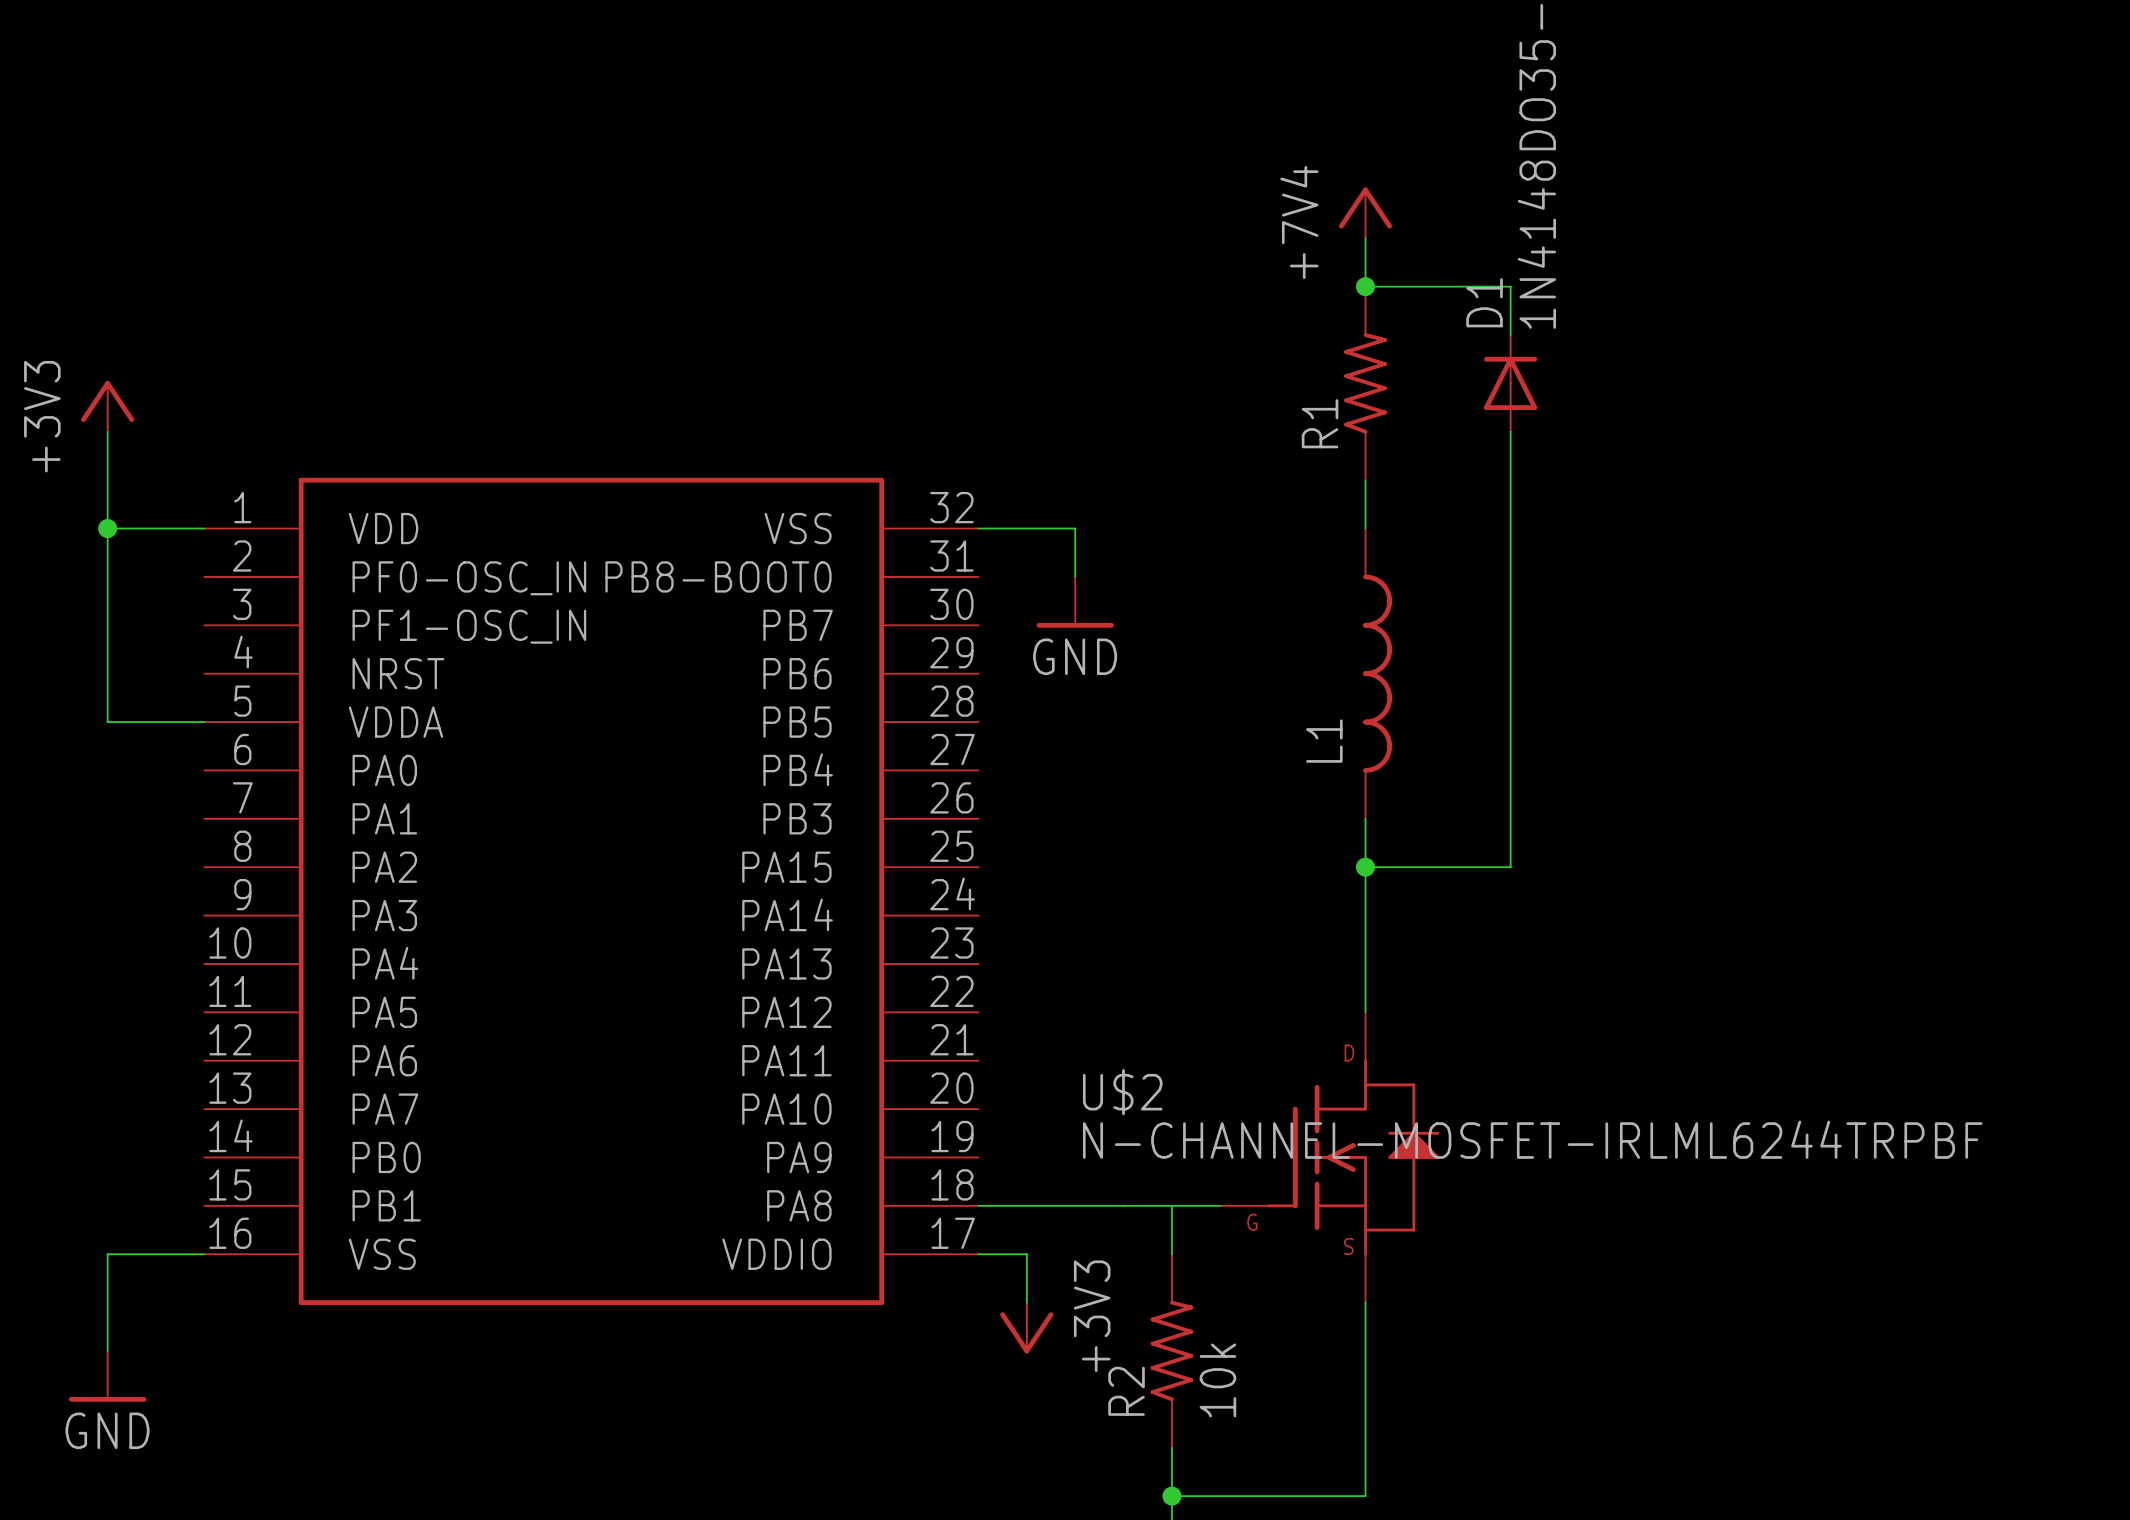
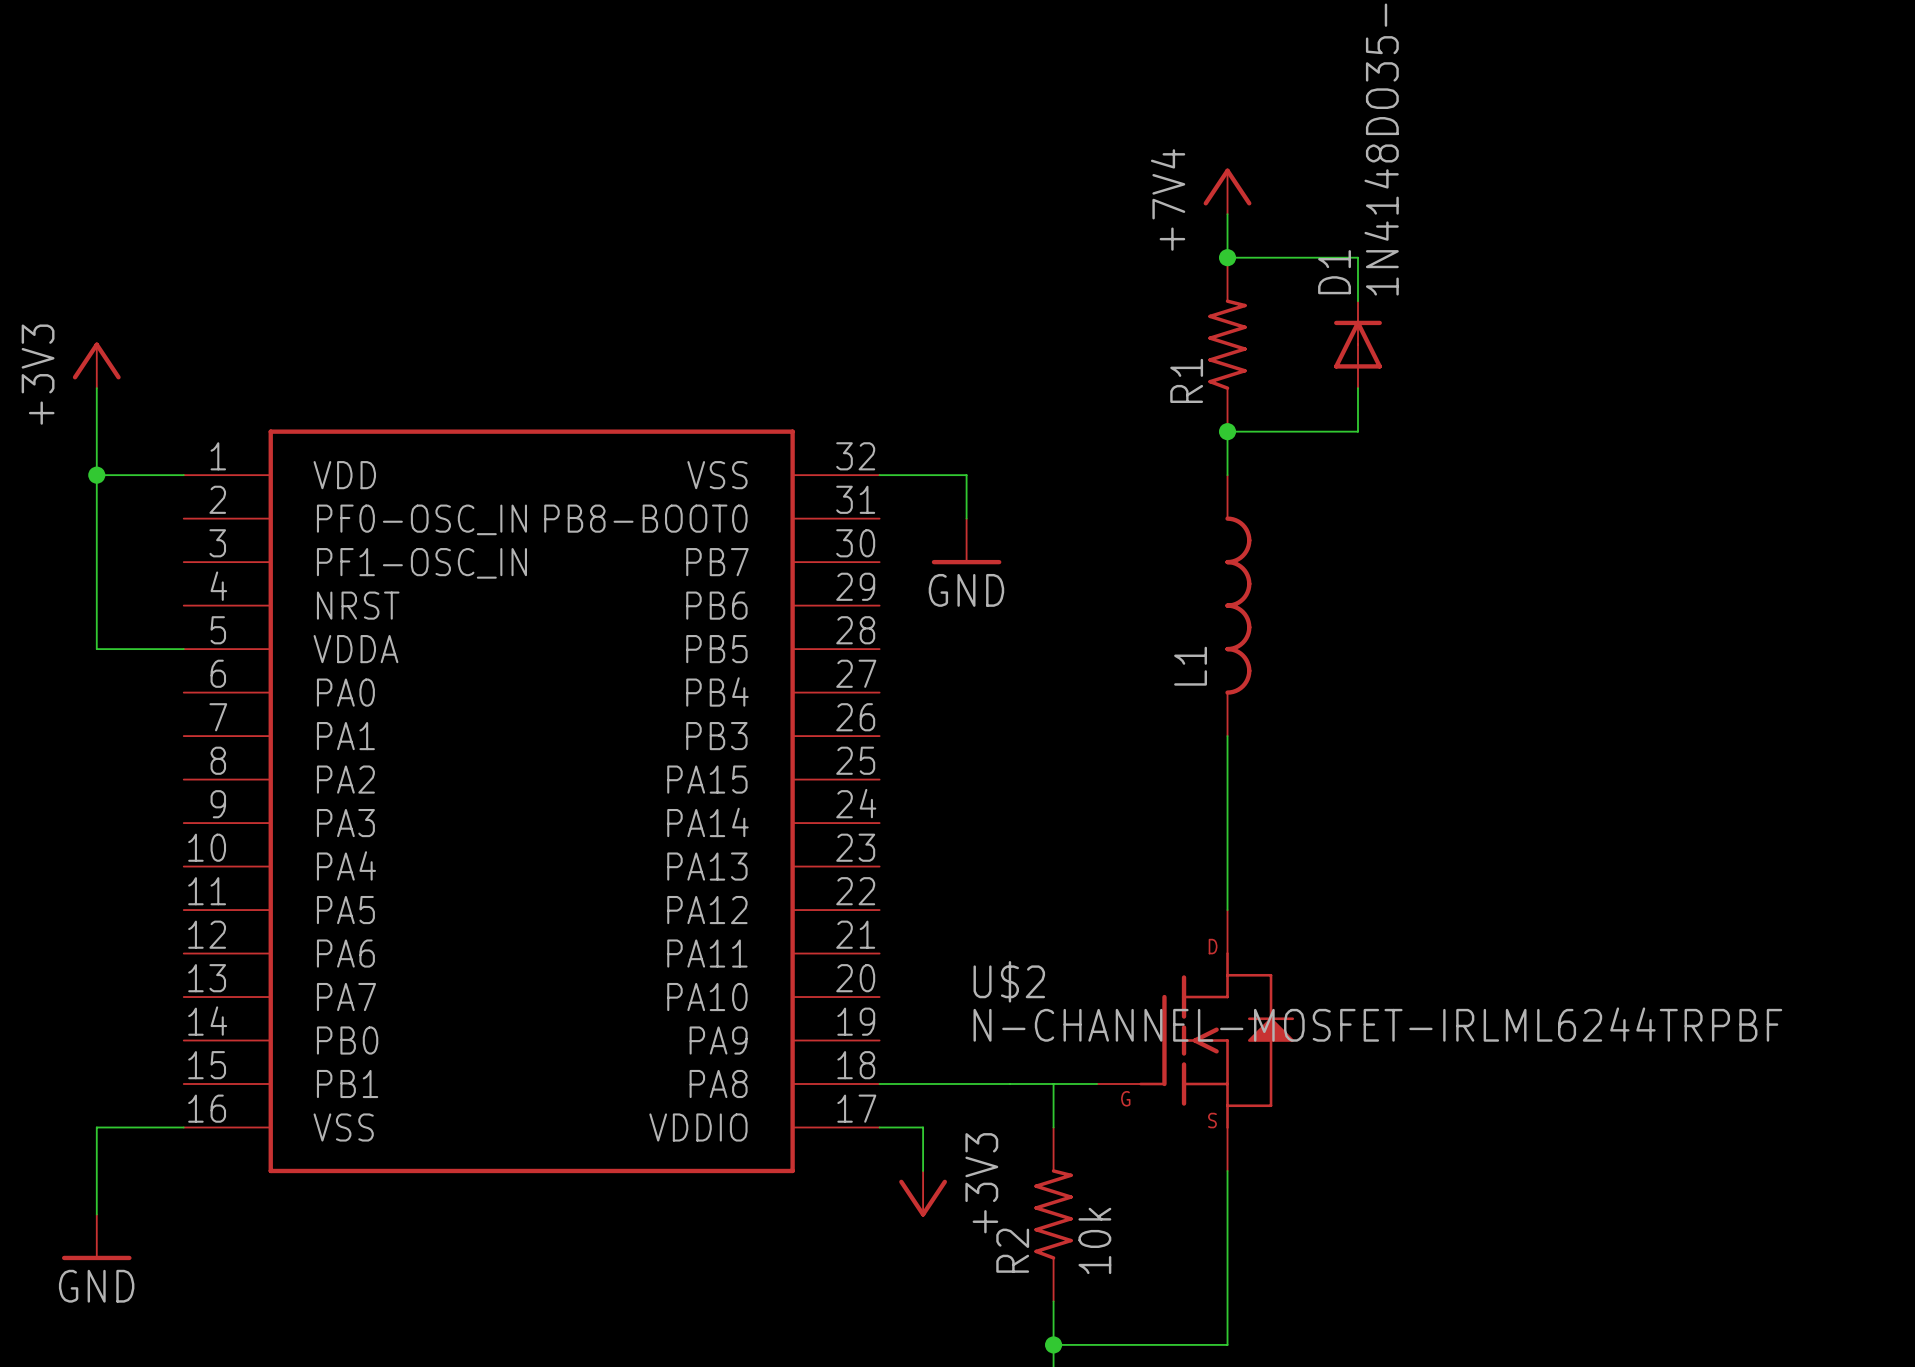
junction: none -> (1227, 431)
wire: (1510, 480) (1510, 867) (1365, 867) -> (1357, 431) (1227, 431)
junction: (1365, 867) -> none

